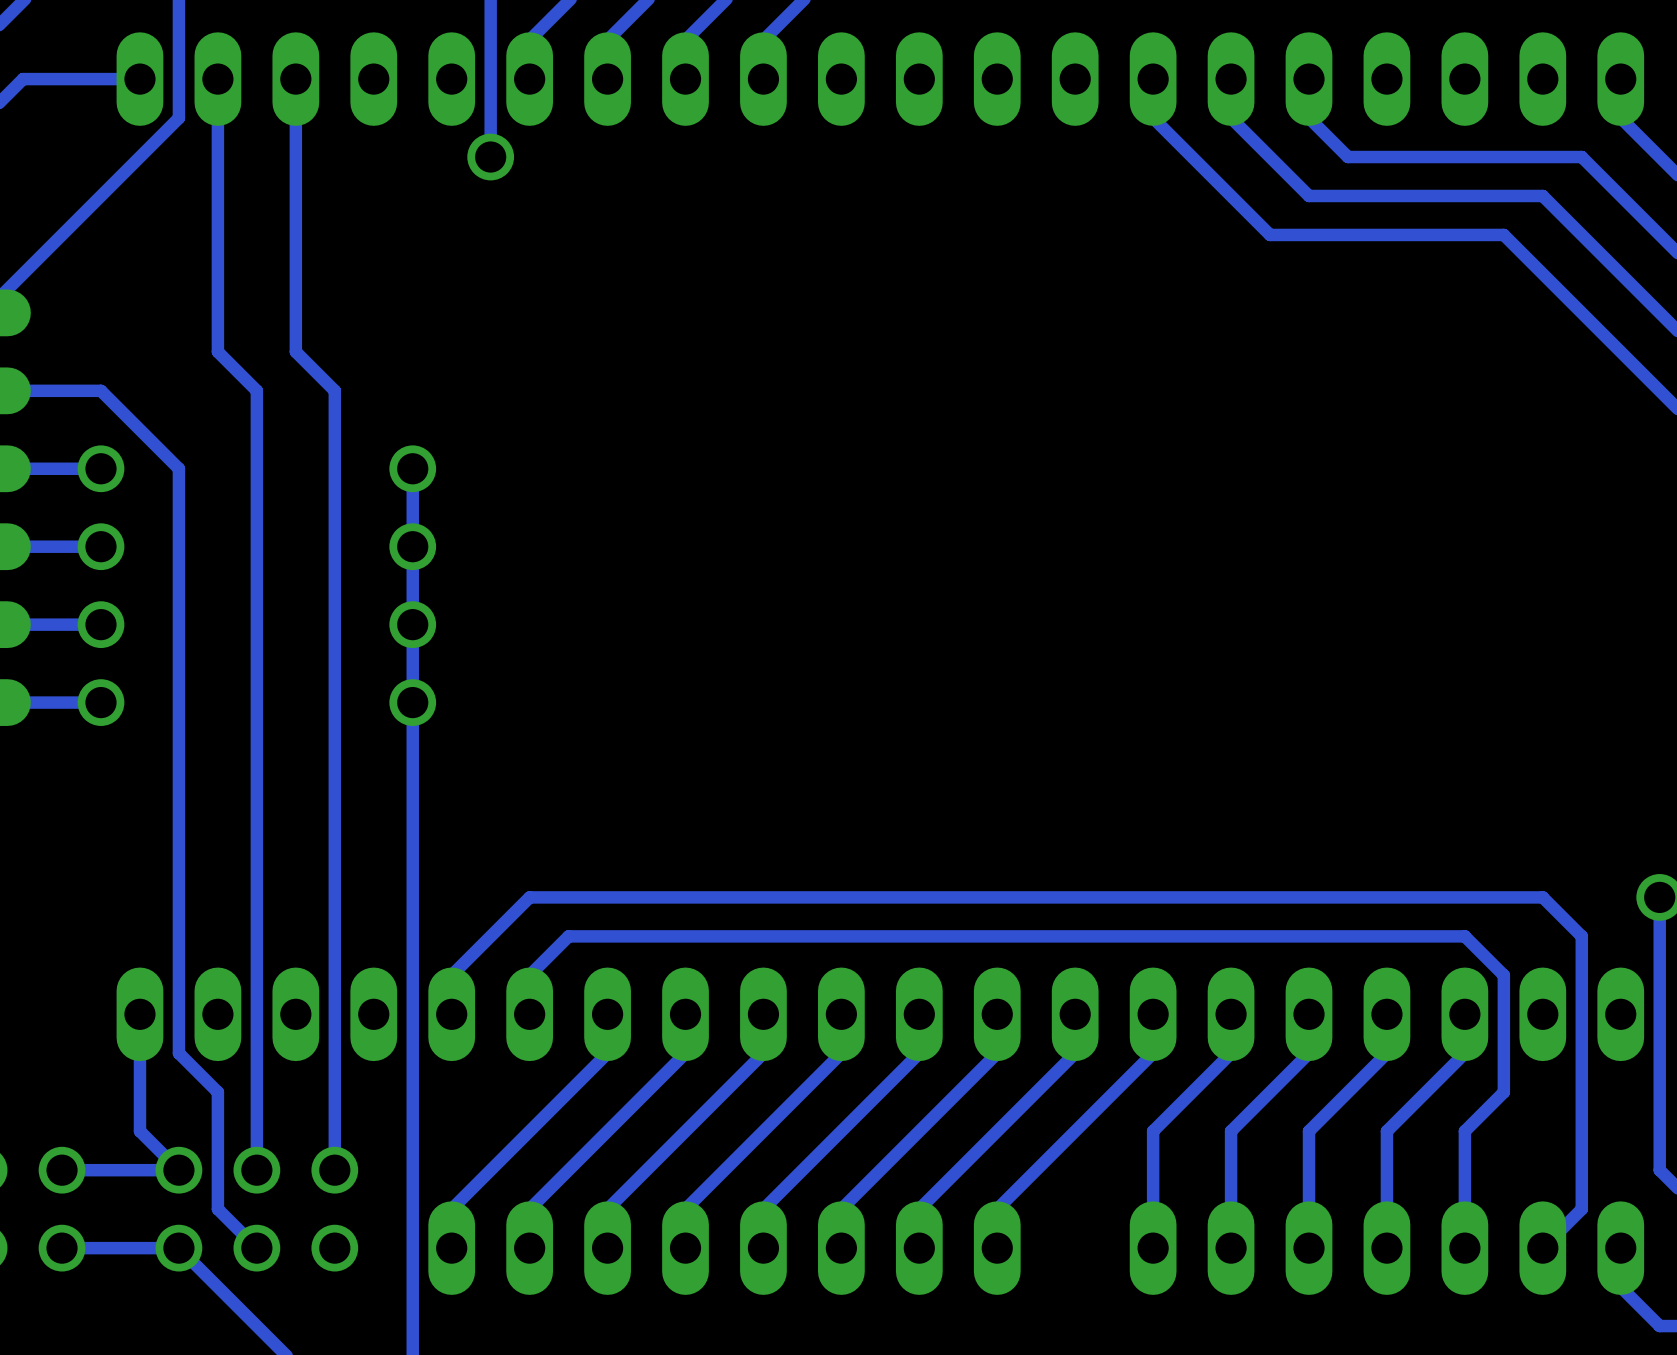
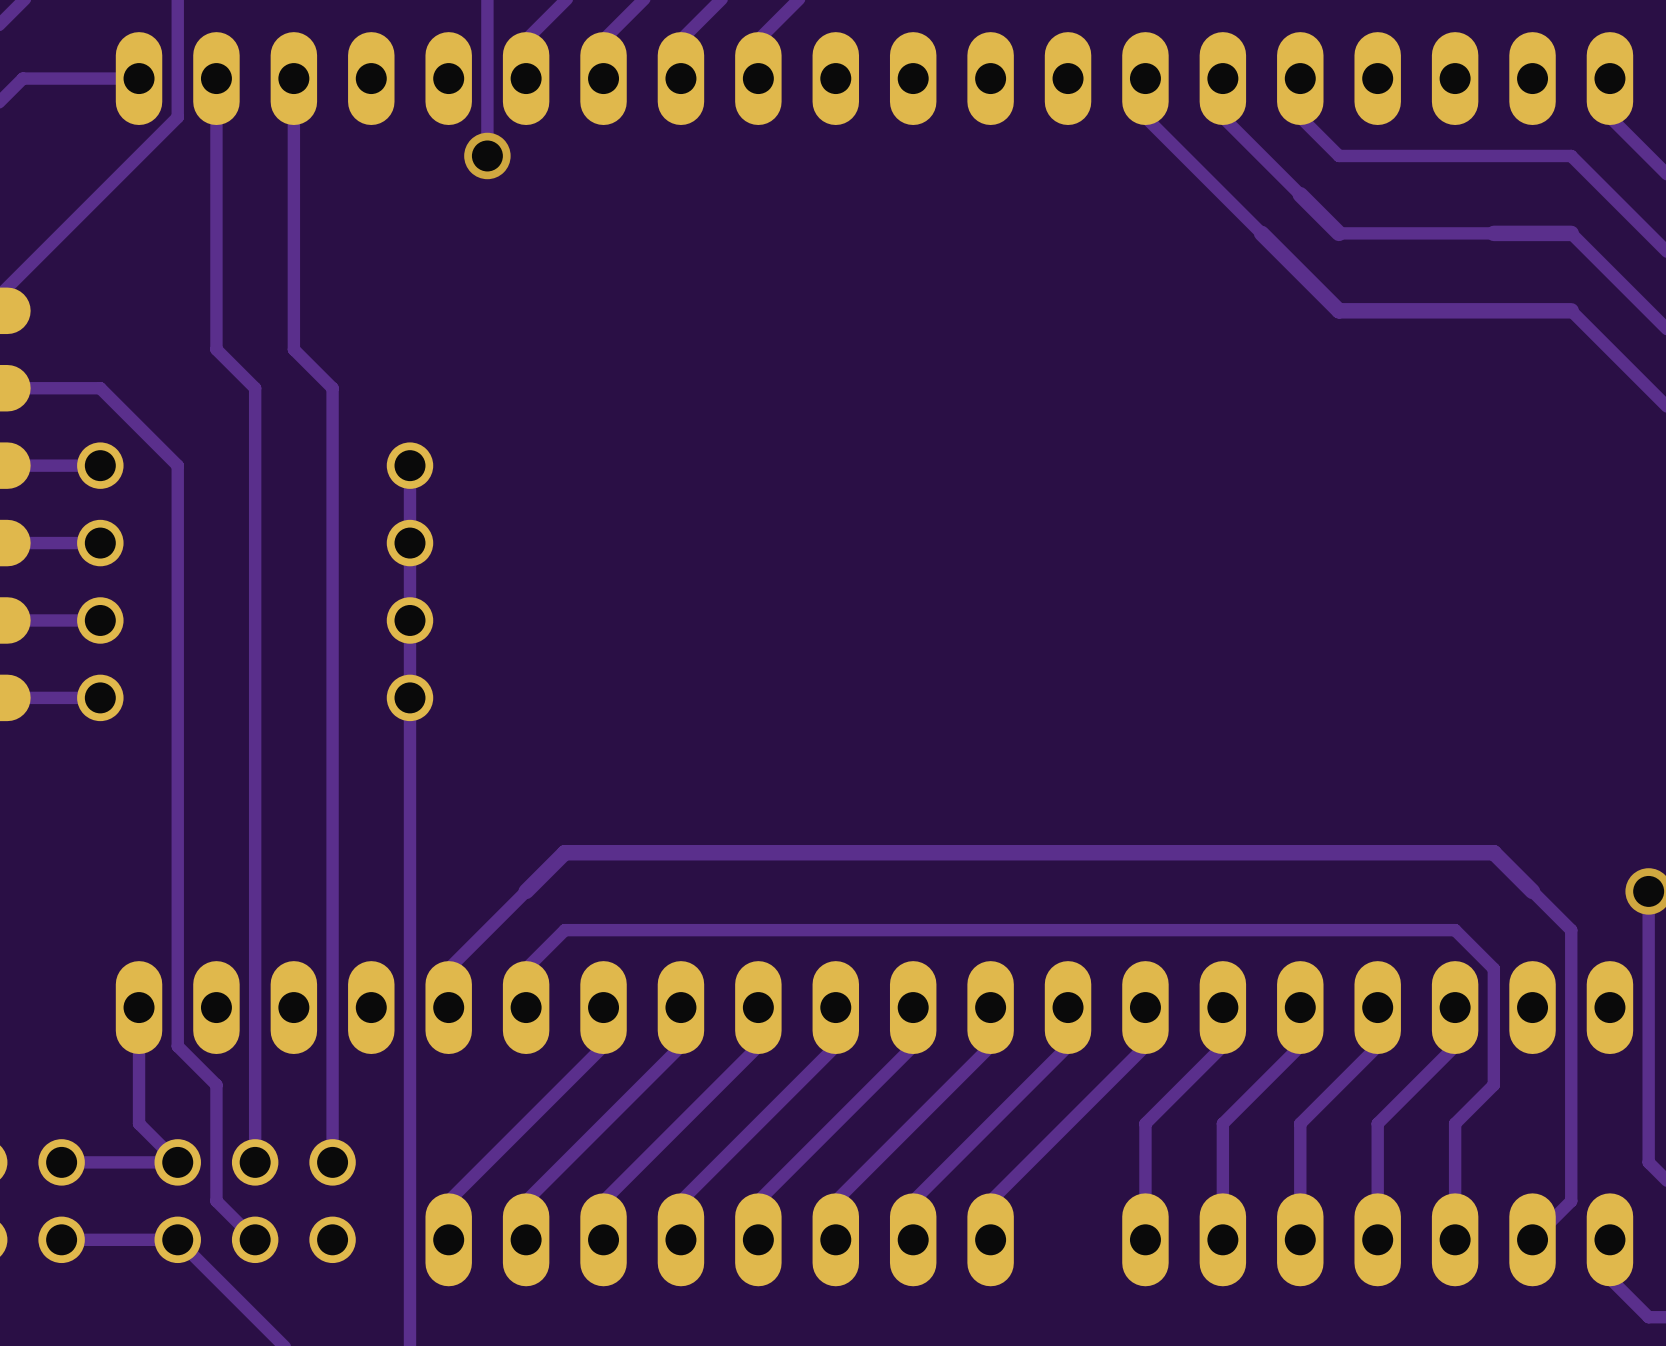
track: (1309, 195) (1542, 195) (1581, 234) -> none
track: none -> (1261, 233) (1338, 310) (1571, 310)
track: (1347, 234) (1270, 234) -> (1338, 233) (1300, 194)
track: (1503, 234) (1581, 312) -> (1493, 233) (1571, 233)
track: (1542, 897) (529, 897) -> (1532, 891) (1493, 852) (564, 852) (526, 891)

